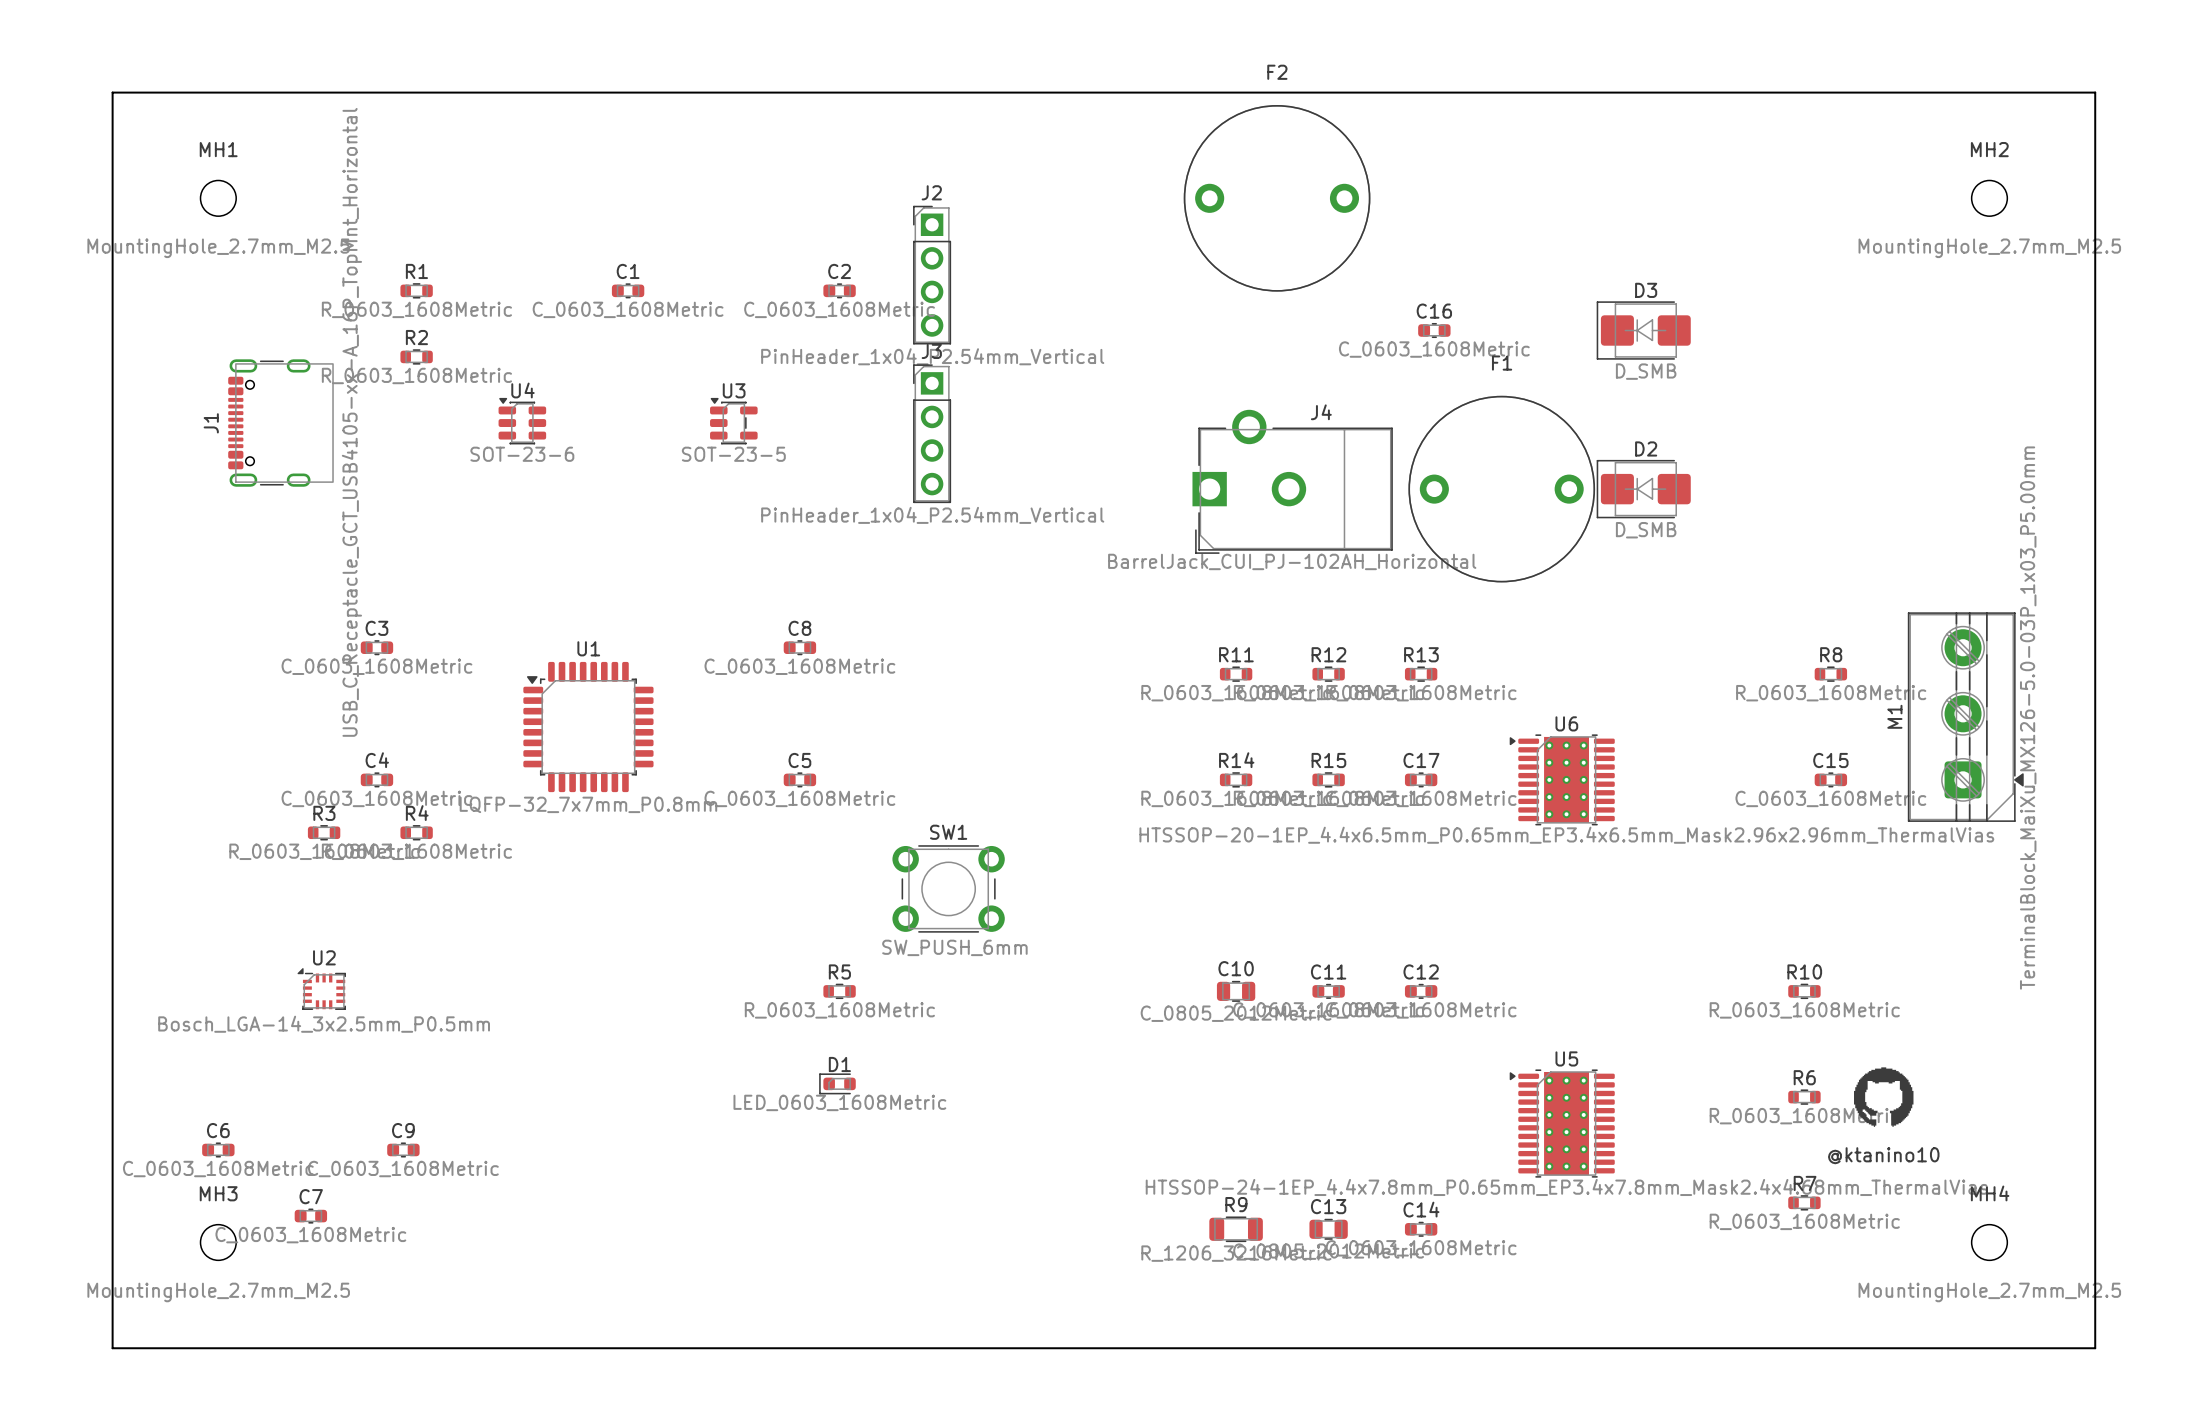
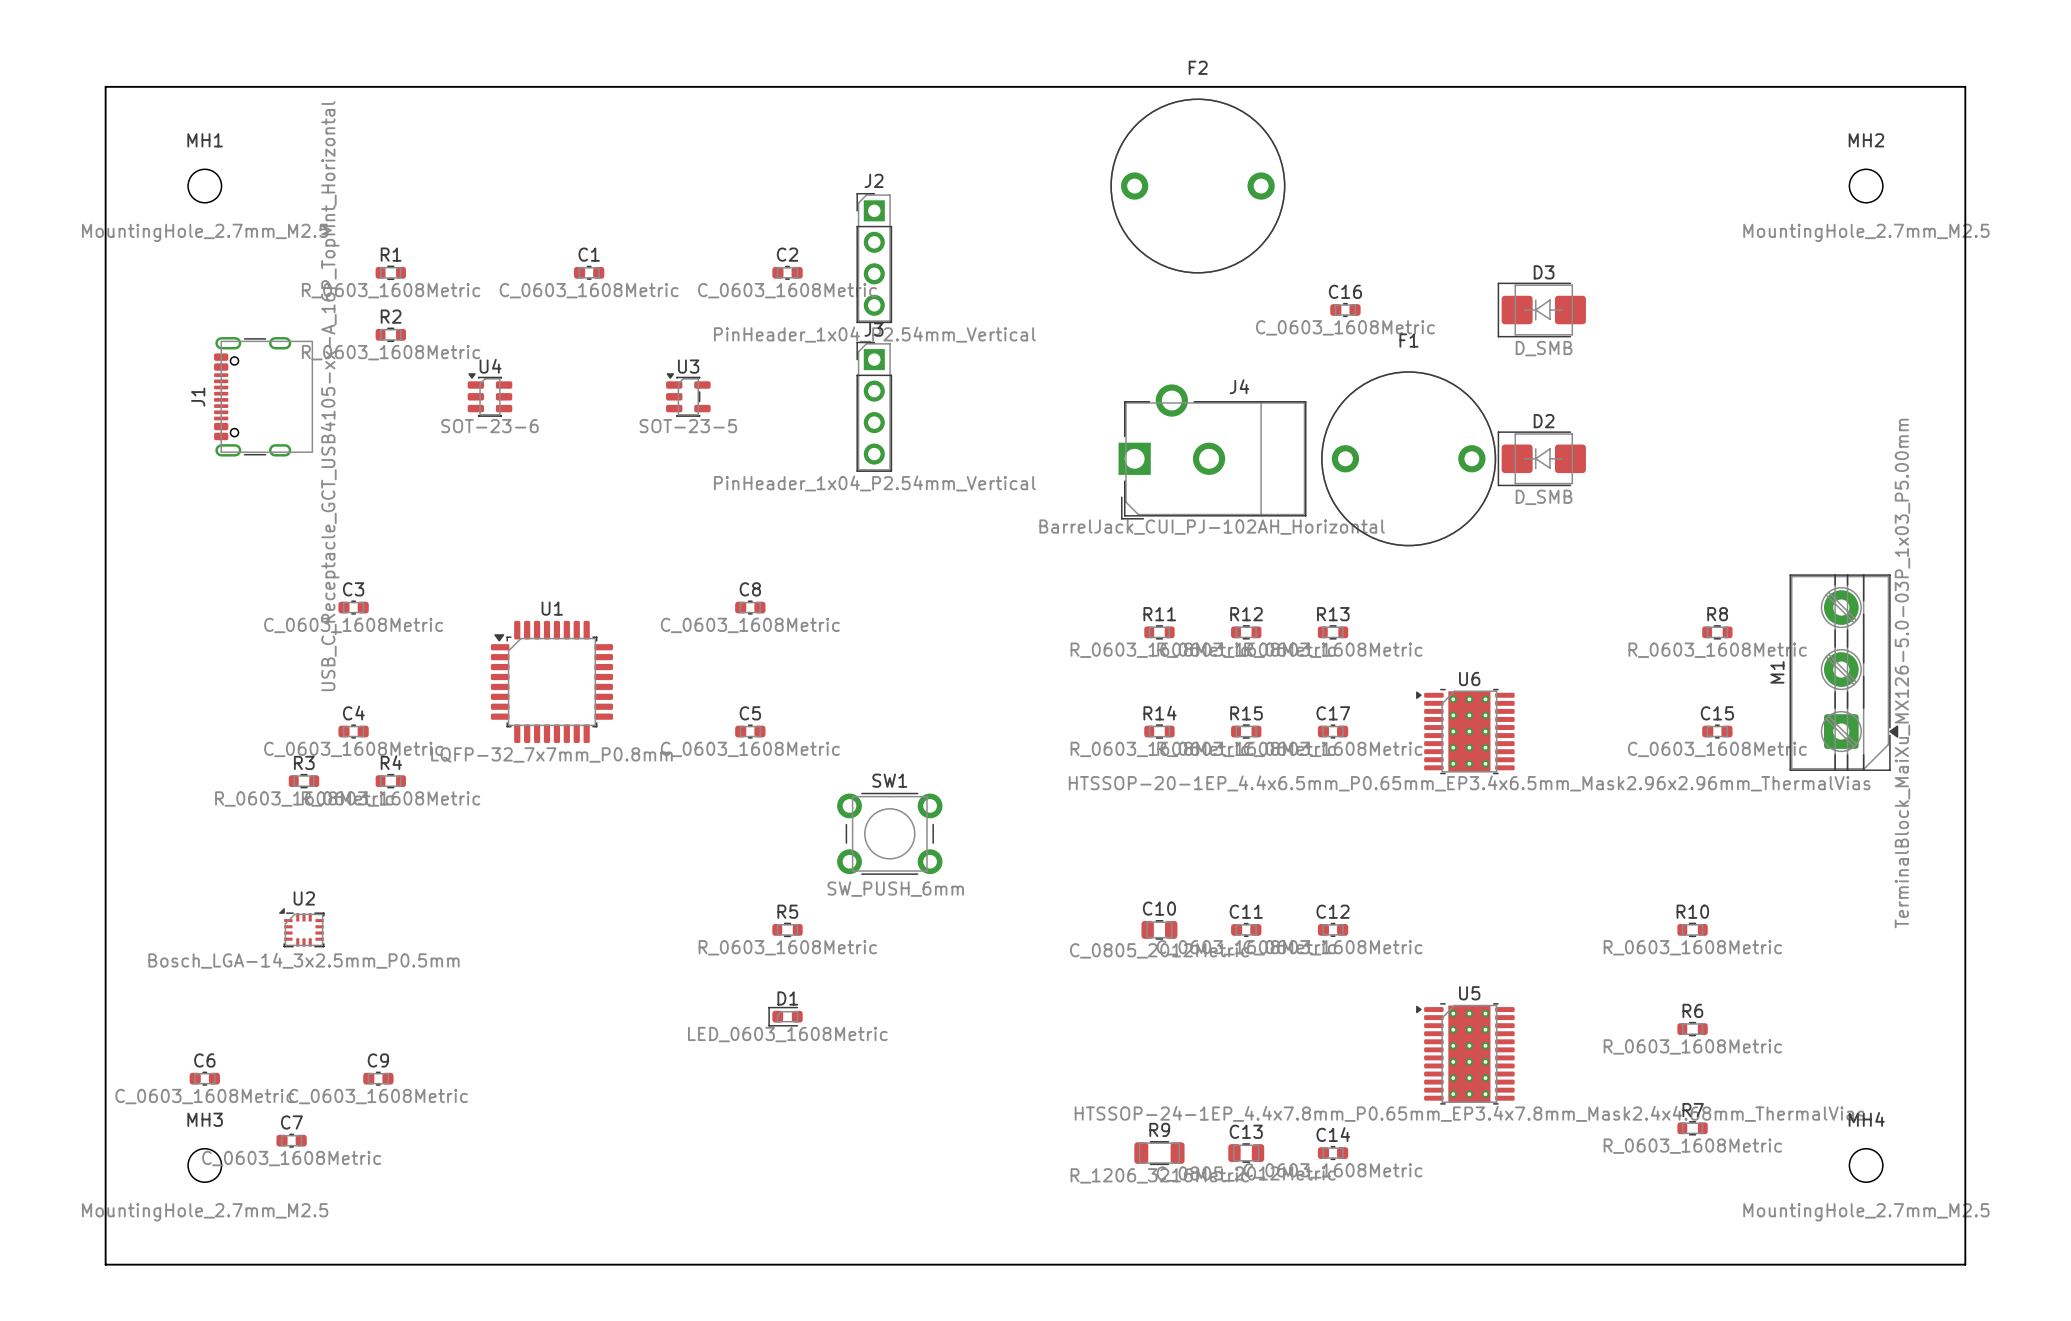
drawing: [1854, 1067, 1914, 1127] -> none

